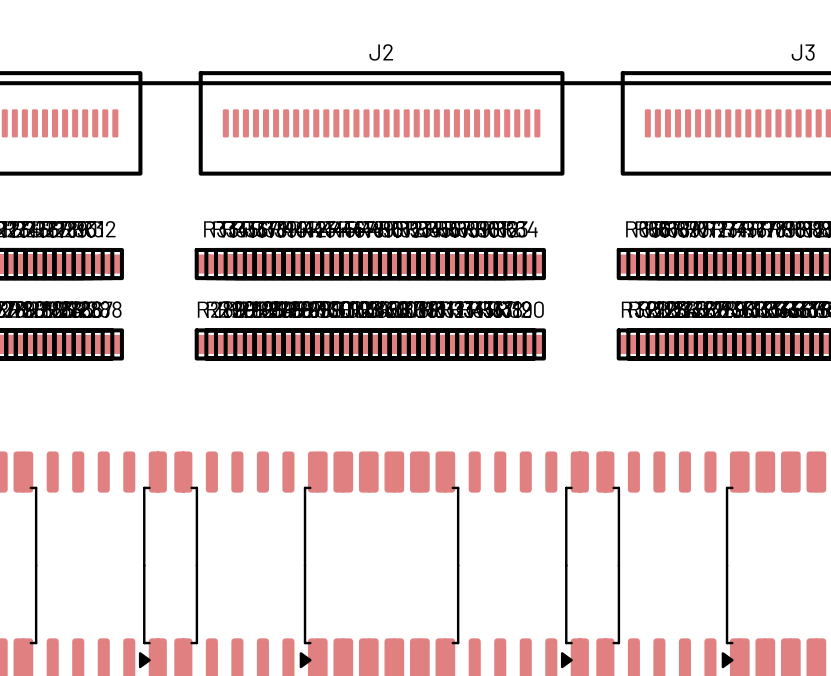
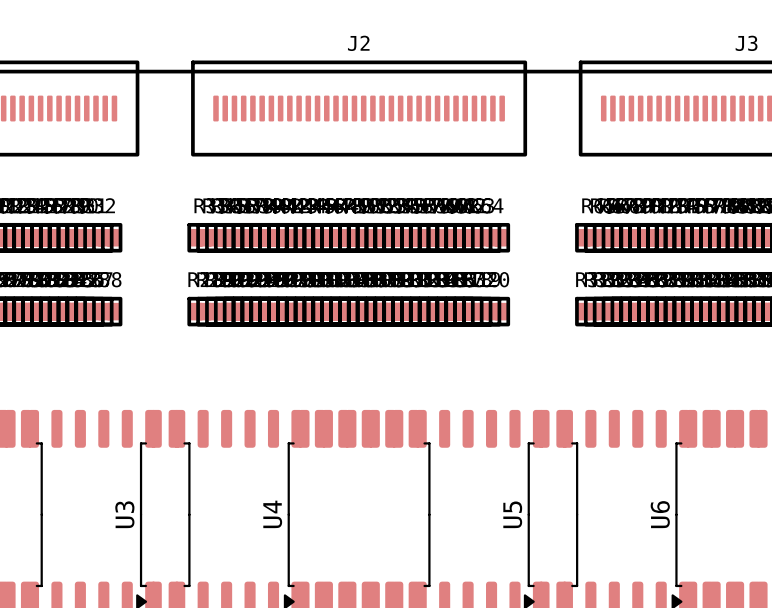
U5 name: none -> U5 (512, 514)
U6 name: none -> U6 (660, 514)
U3 name: none -> U3 (124, 514)
U4 name: none -> U4 (272, 514)

